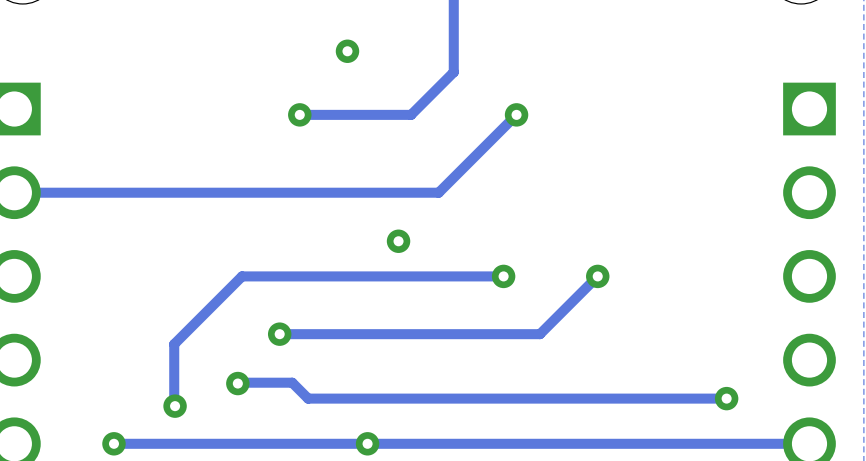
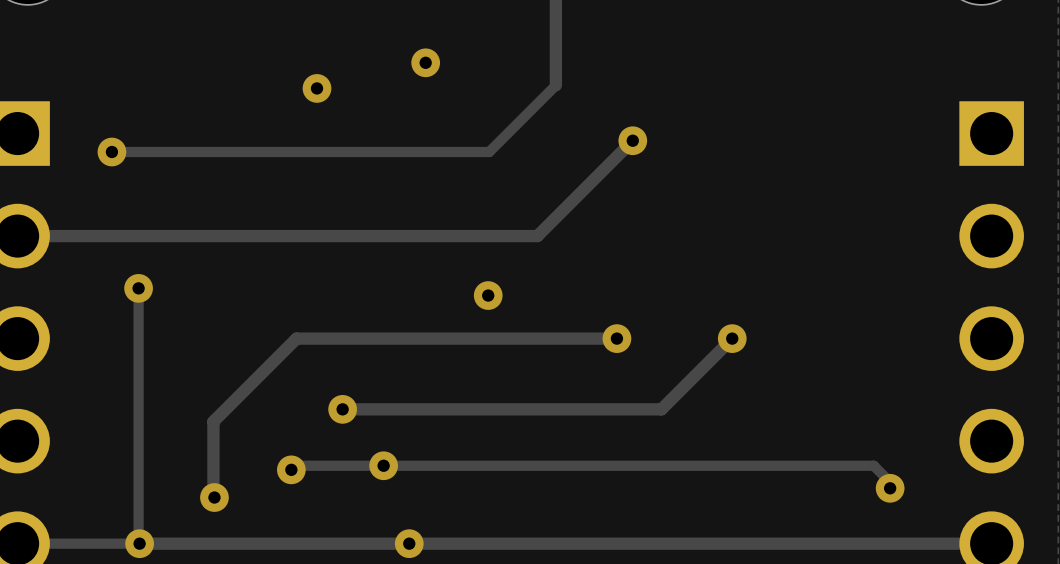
track: (453, 69) (453, 72) (411, 114) (299, 114) -> (555, 85) (489, 152) (111, 152)
via position: (299, 114) -> (317, 88)
via: none -> (111, 152)
track: none -> (138, 288) (139, 543) (17, 543)
via: none -> (138, 288)
track: none -> (290, 465) (873, 465) (890, 482) (890, 492)
via: none -> (383, 465)
track: (237, 383) (292, 382) (308, 398) (726, 398) -> none
via position: (367, 443) -> (409, 543)

